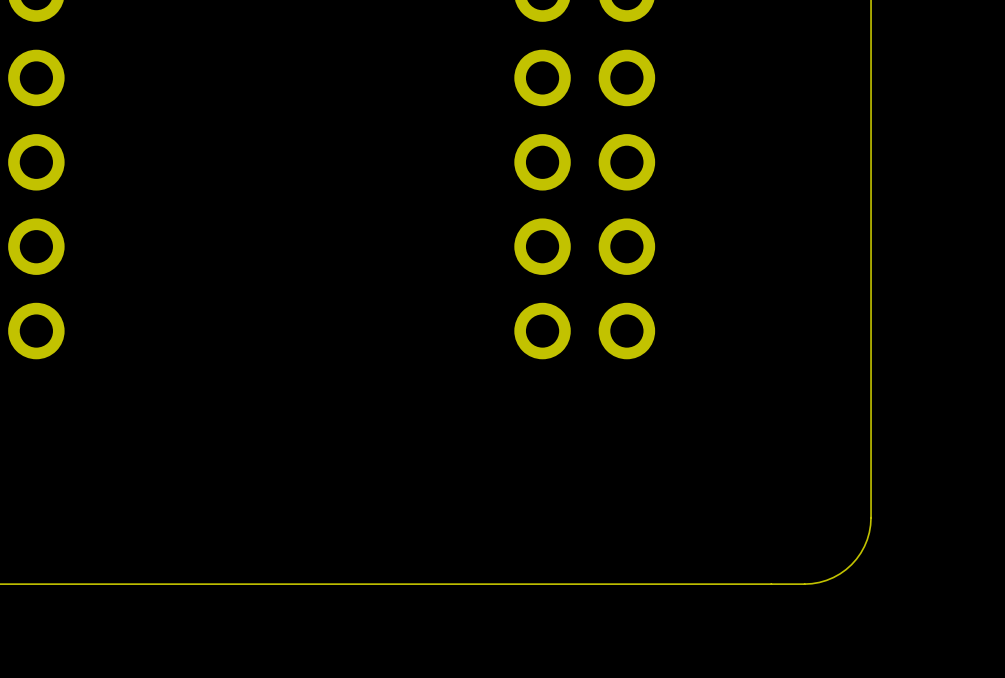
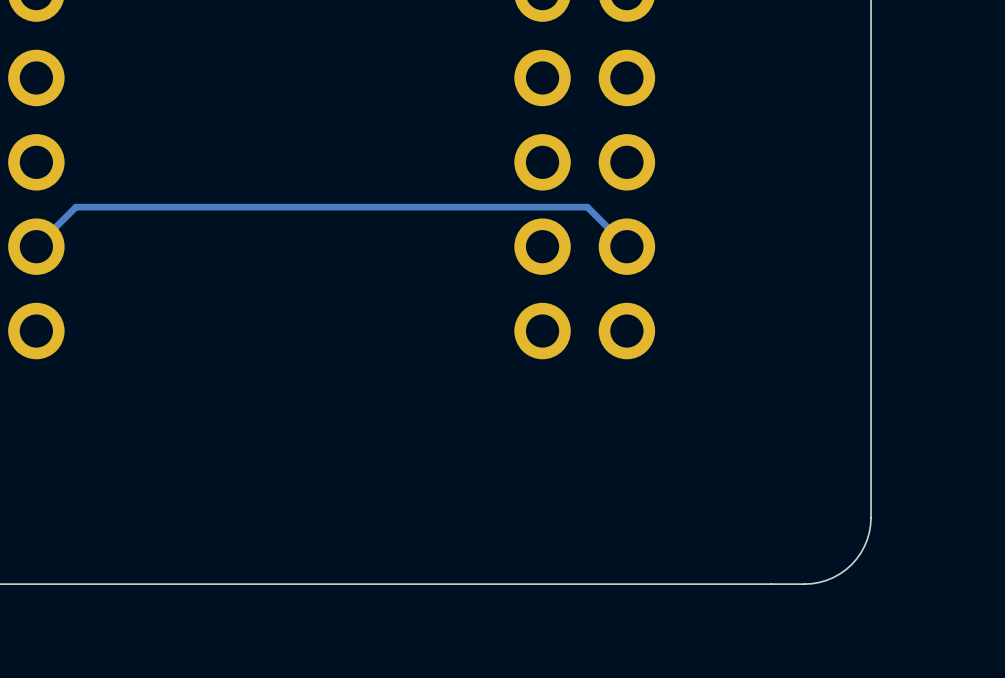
track: none -> (626, 246) (587, 207) (75, 207) (36, 246)

